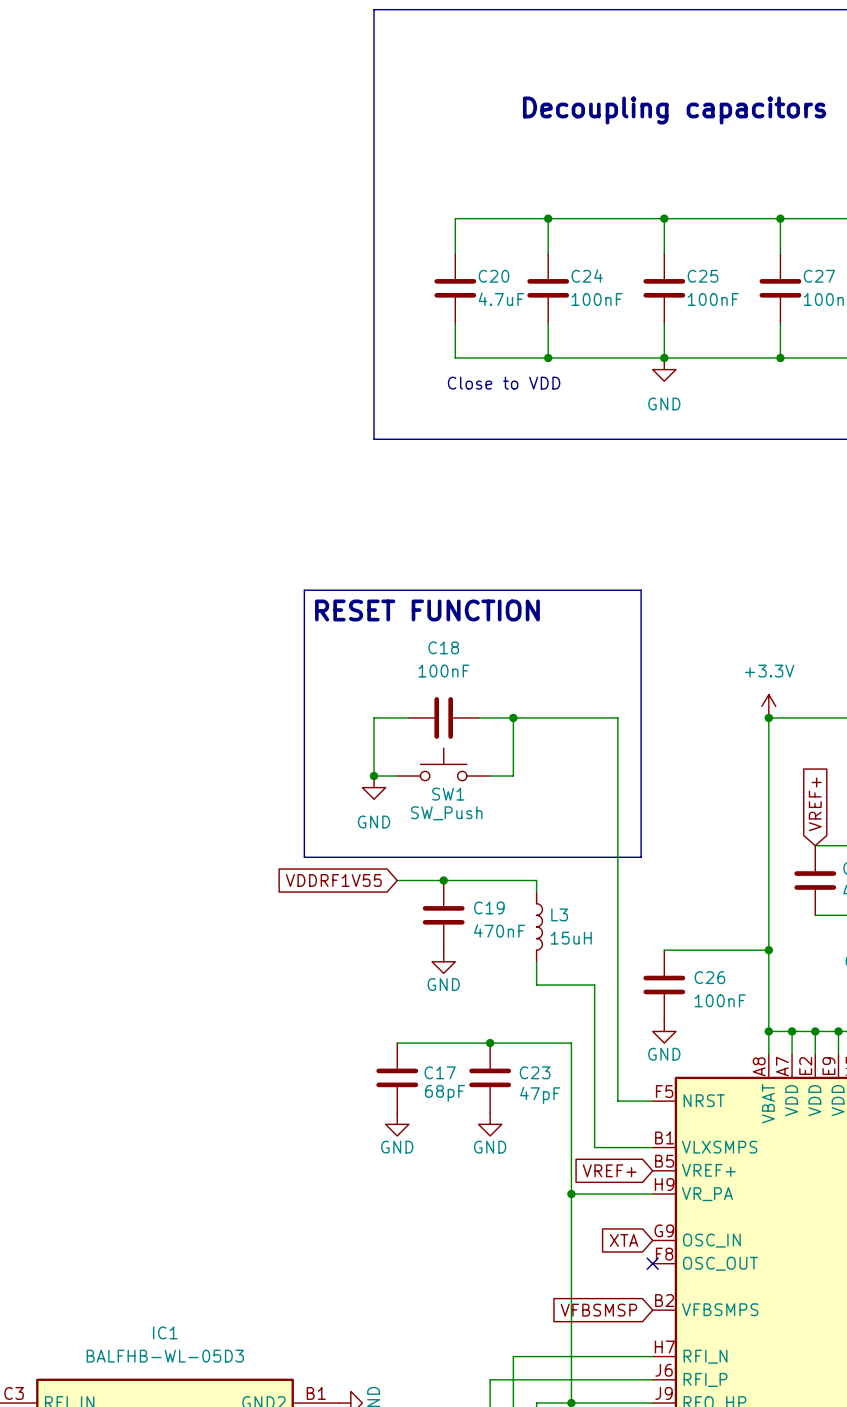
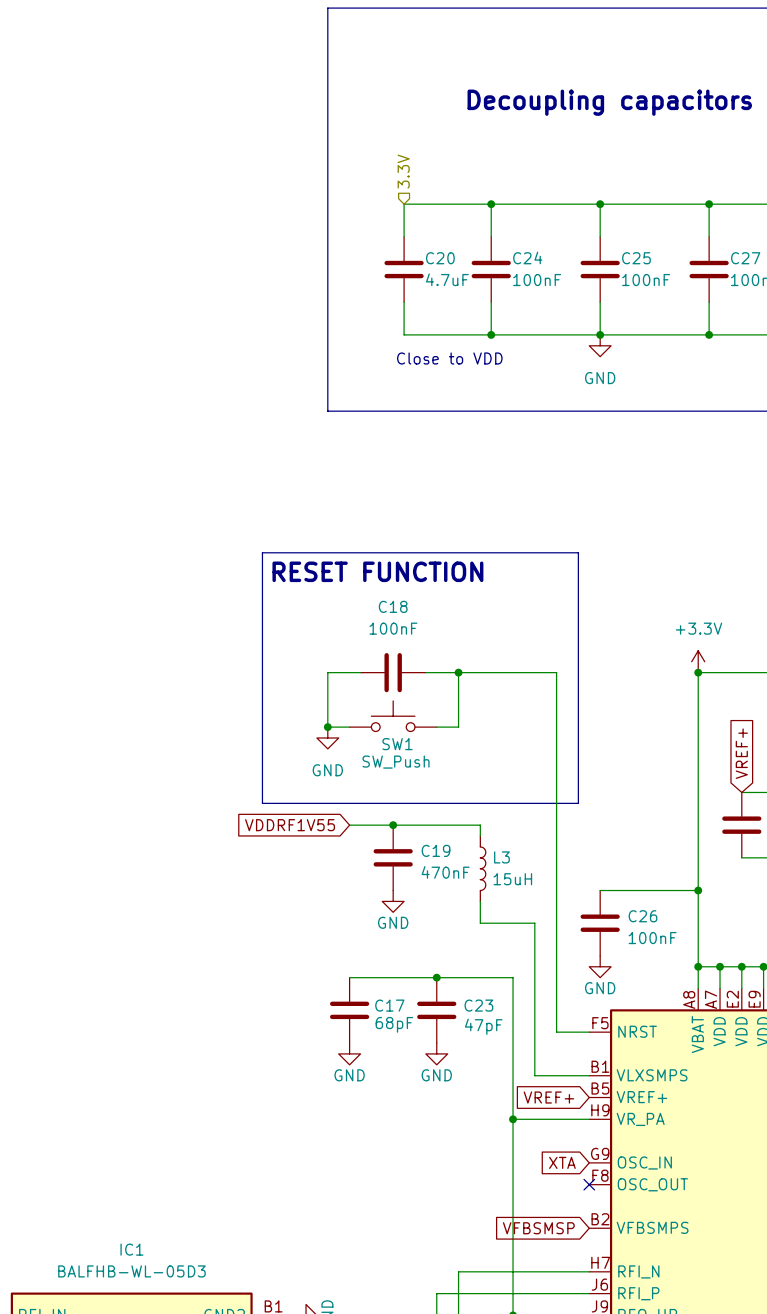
hierarchical label: none -> 3.3V (403, 171)

